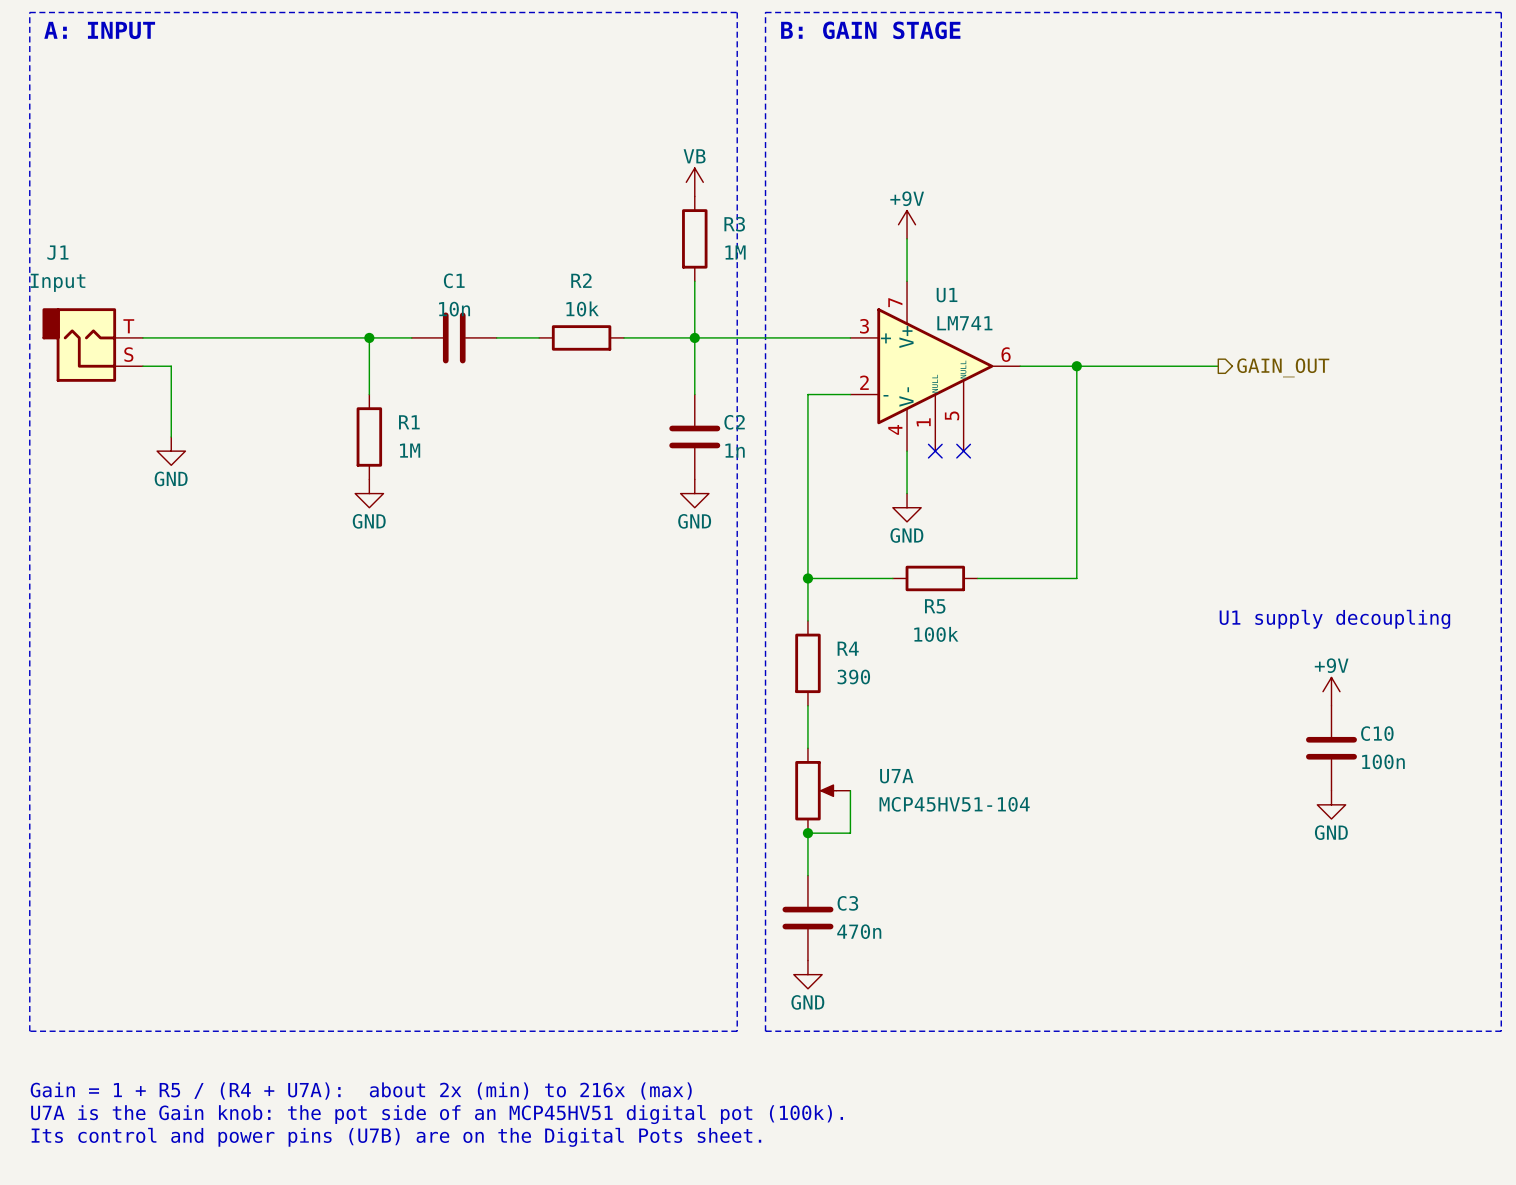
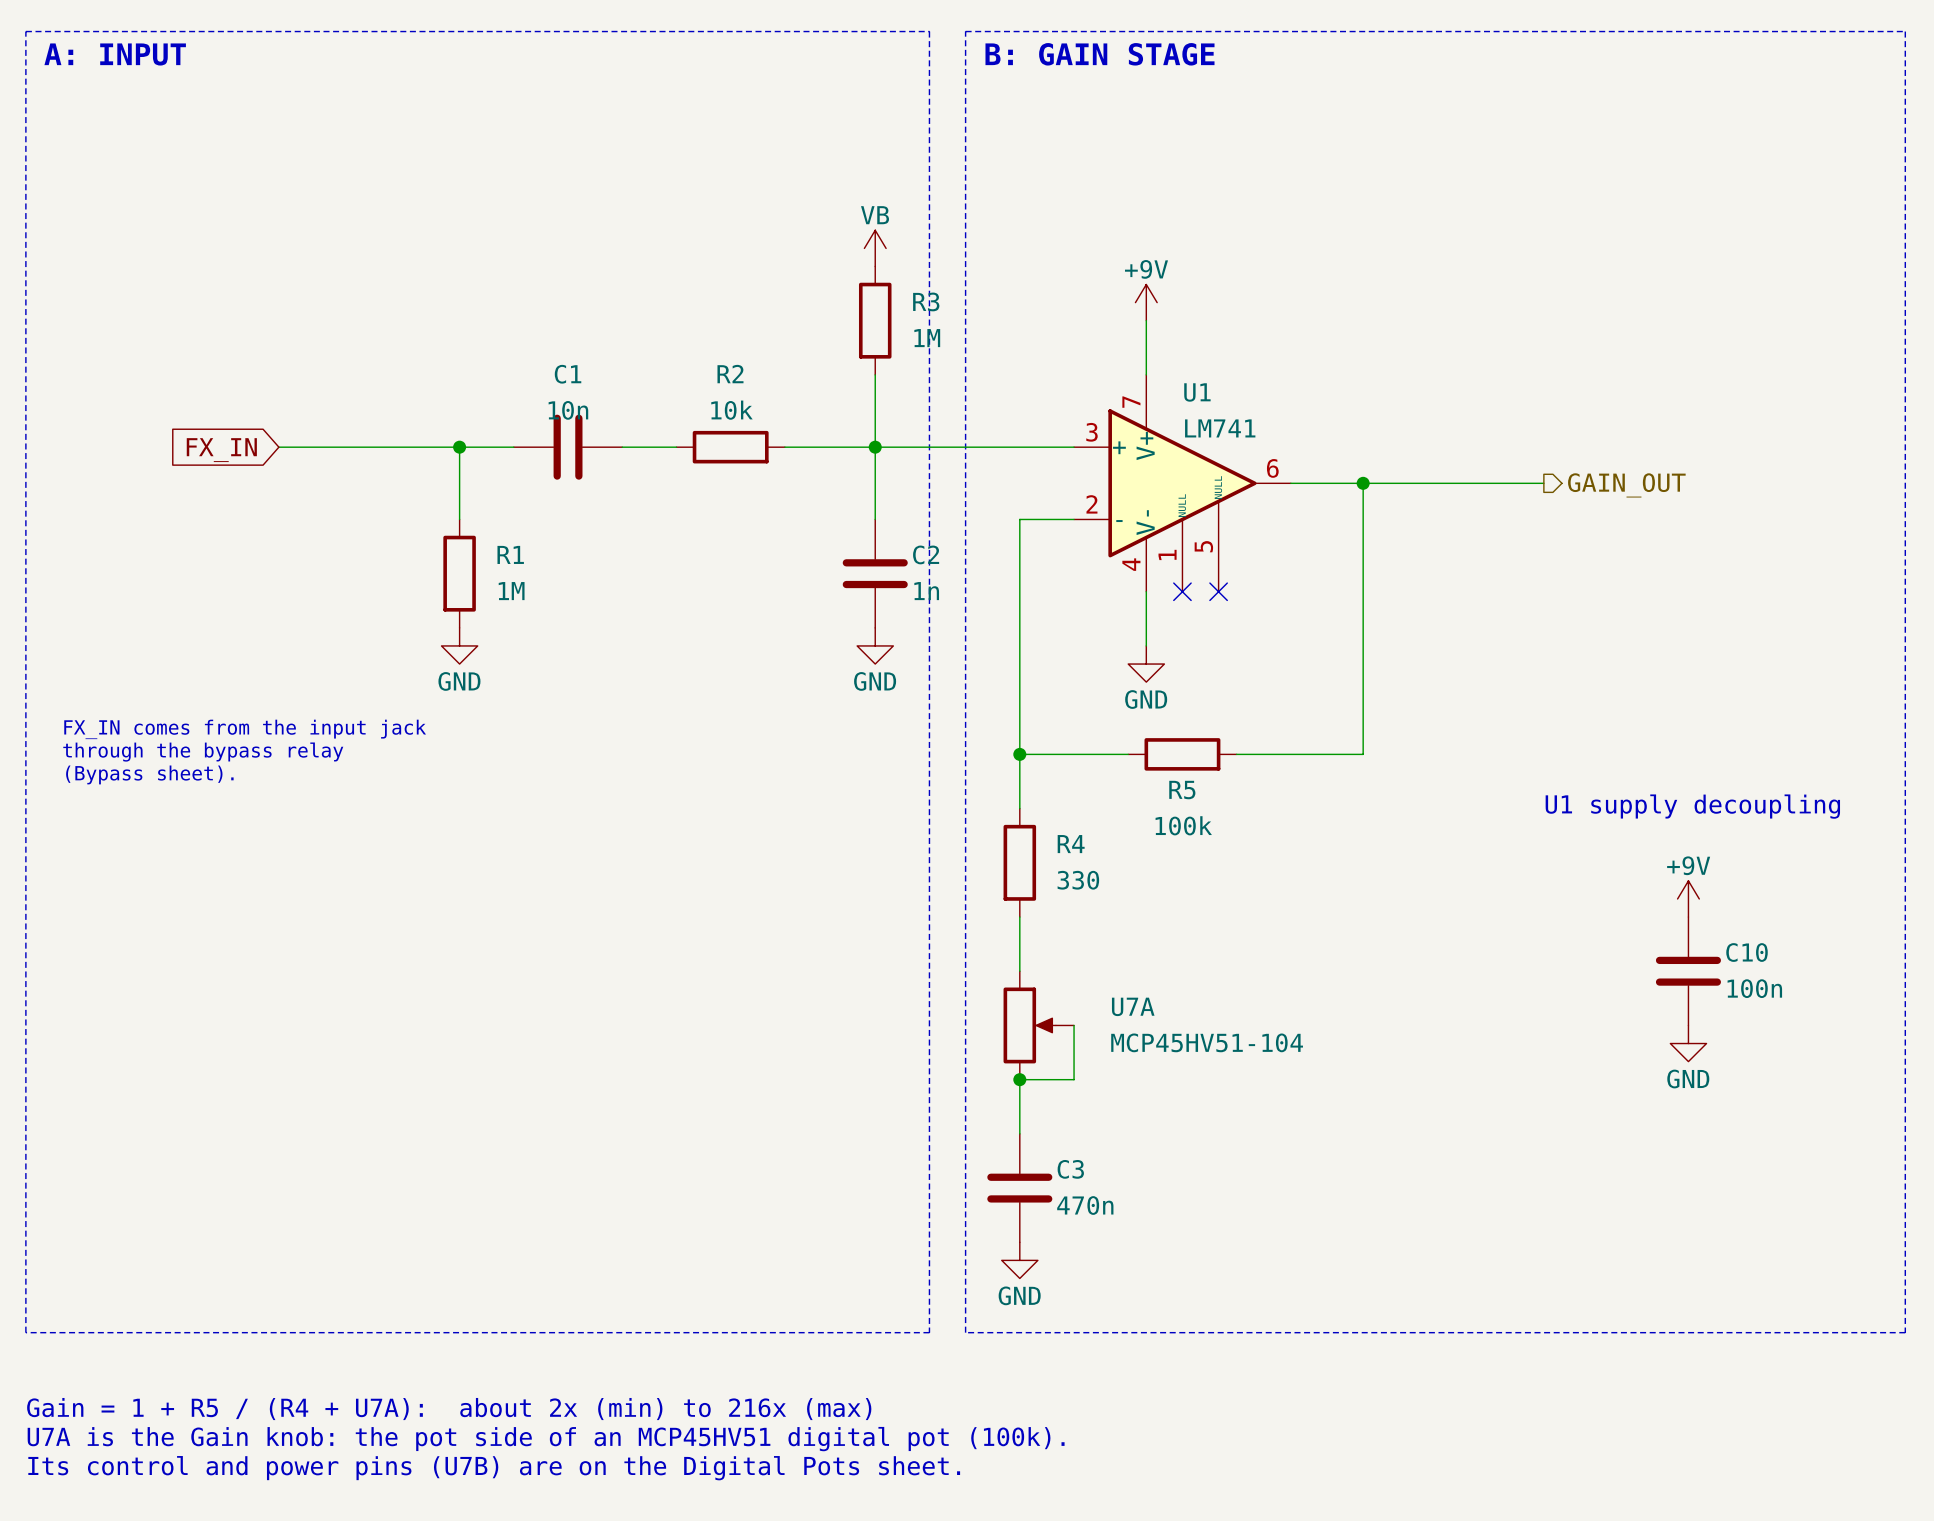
wire: (142, 337) (227, 337) -> none
global label: none -> FX_IN (221, 450)
J1: Input (92, 345) -> none
wire: (142, 366) (171, 366) (171, 436) -> none
power symbol: GND (171, 451) -> none
text: none -> FX_IN comes from the input jack (245, 729)
text: none -> through the bypass relay (203, 752)
text: none -> (Bypass sheet). (149, 774)
R4 value: 390 (853, 677) -> 330 (1078, 880)

